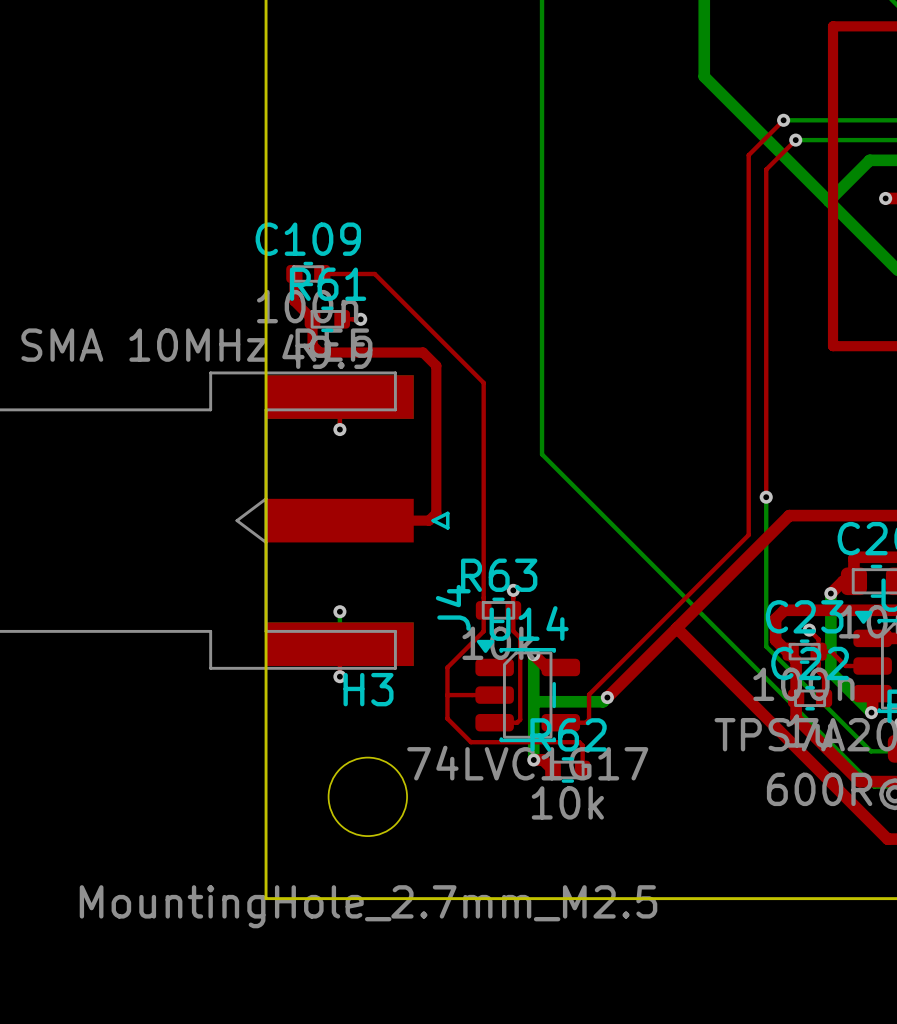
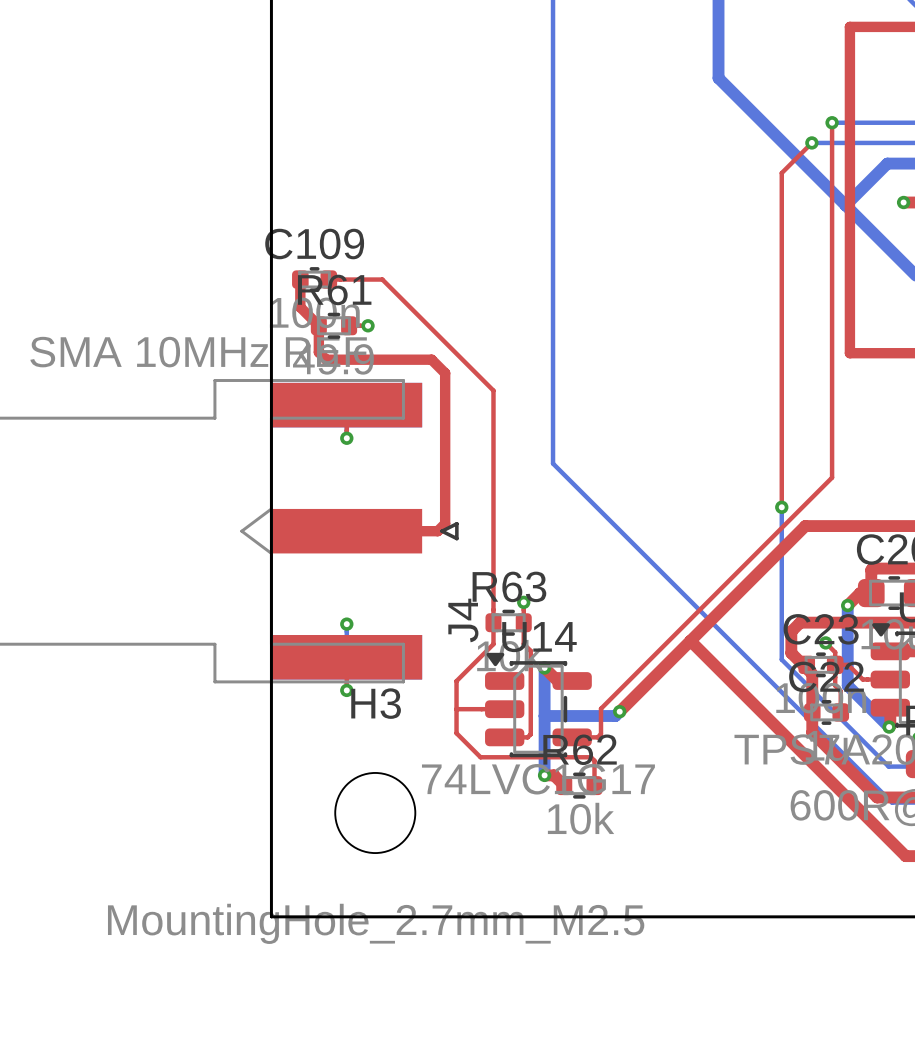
top track: (783, 120) (748, 155) (748, 535) -> (832, 122) (832, 477) (763, 545)
bottom track: (783, 120) (815, 120) -> none
via position: (783, 120) -> (832, 122)

